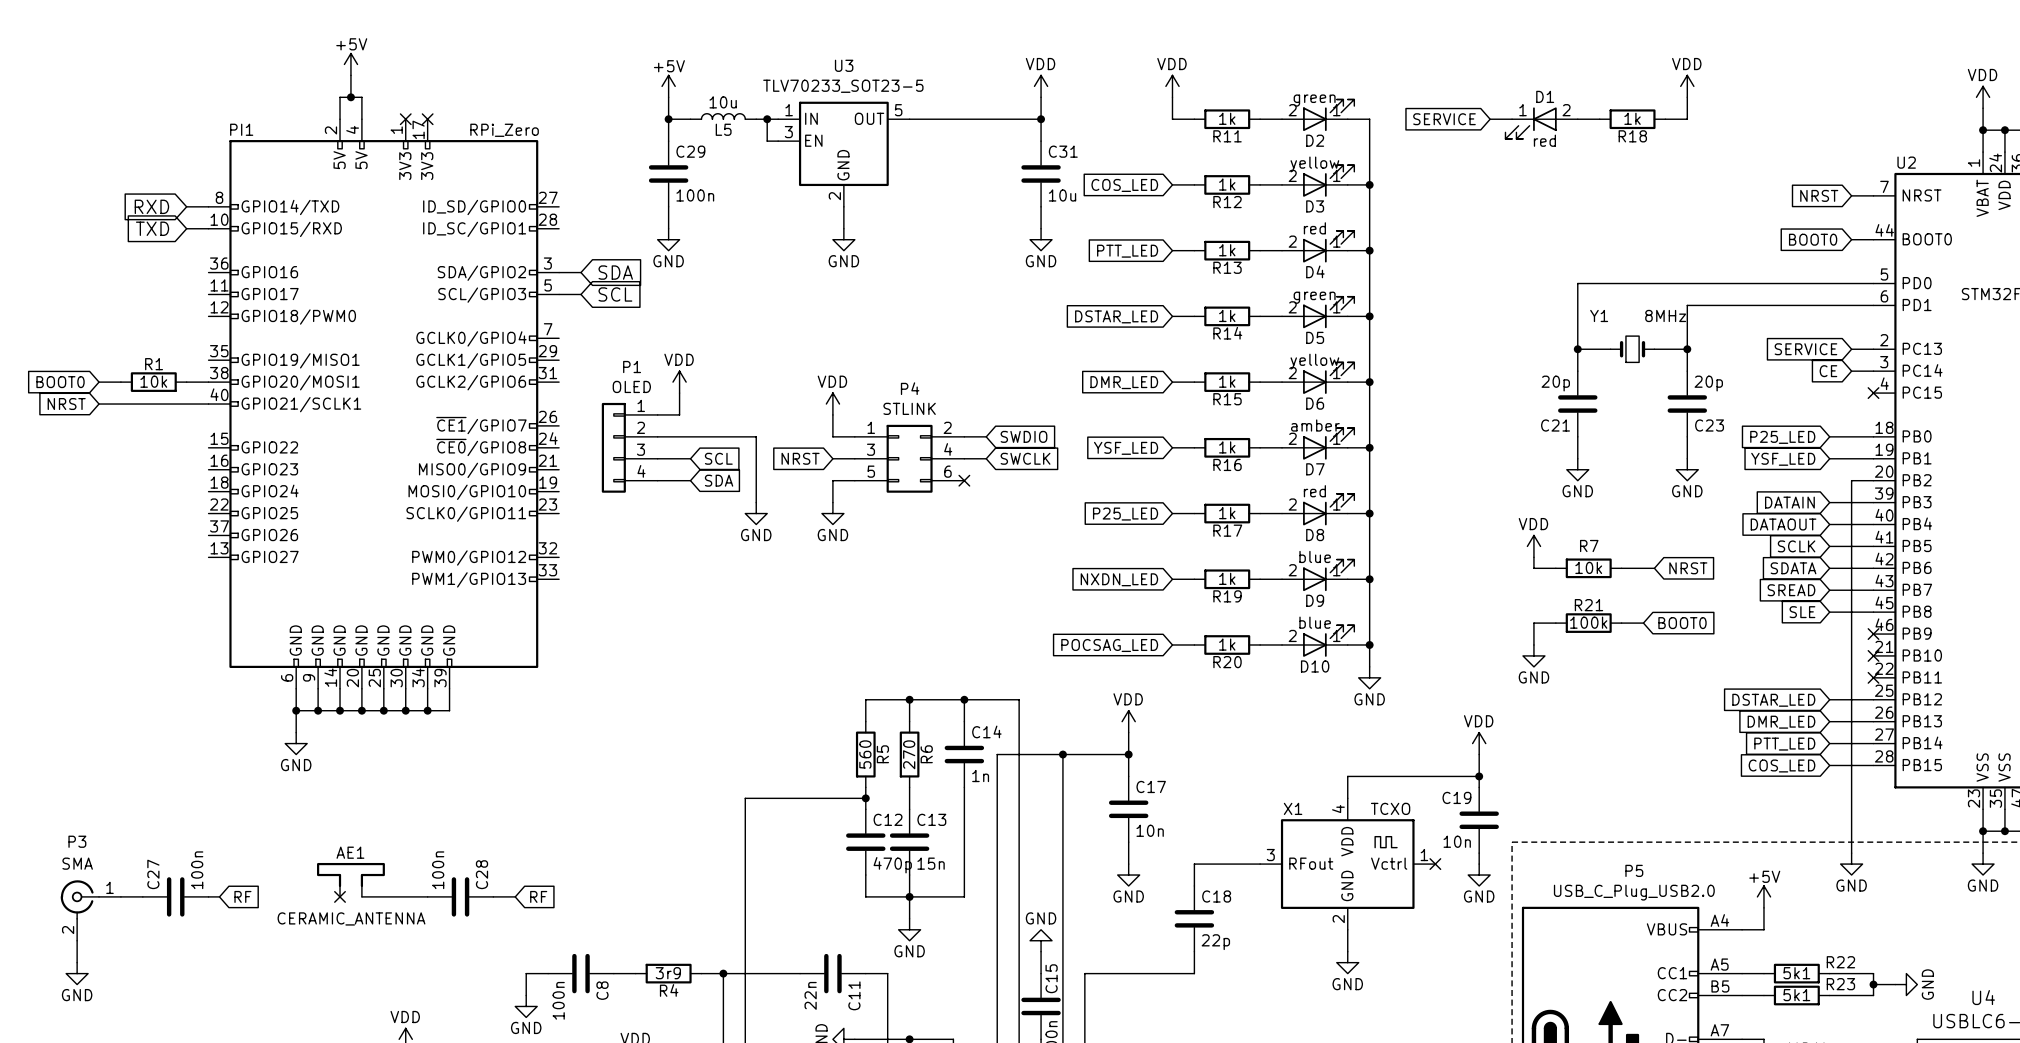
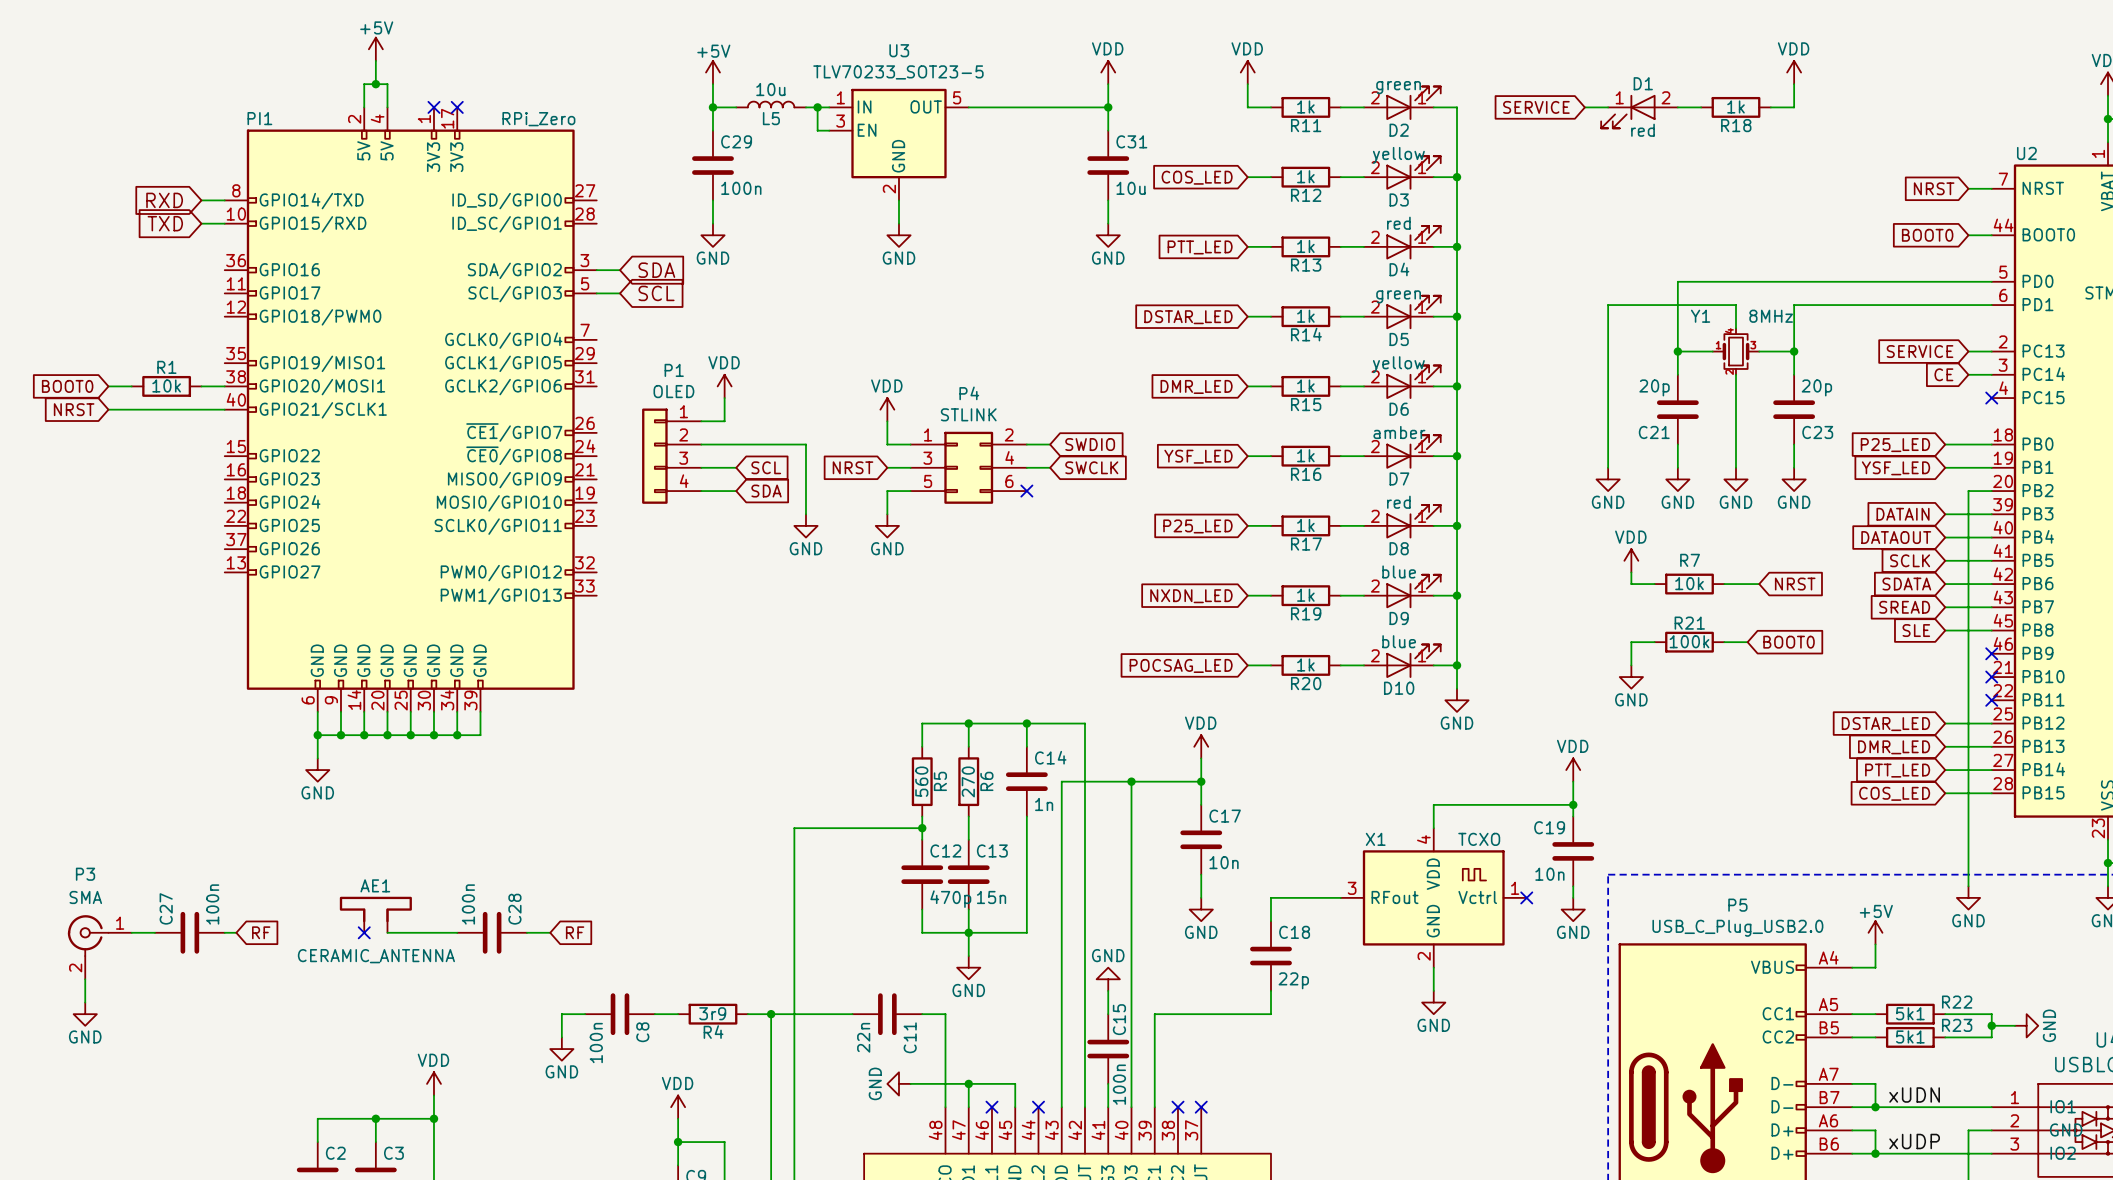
wire: none -> (1736, 328) (1736, 305) (1608, 305) (1608, 467)
Y1 symbol: [1610, 336, 1655, 363] -> [1712, 328, 1760, 375]
wire: none -> (1736, 374) (1736, 467)
power symbol: none -> GND (1608, 479)
power symbol: none -> GND (1736, 479)

